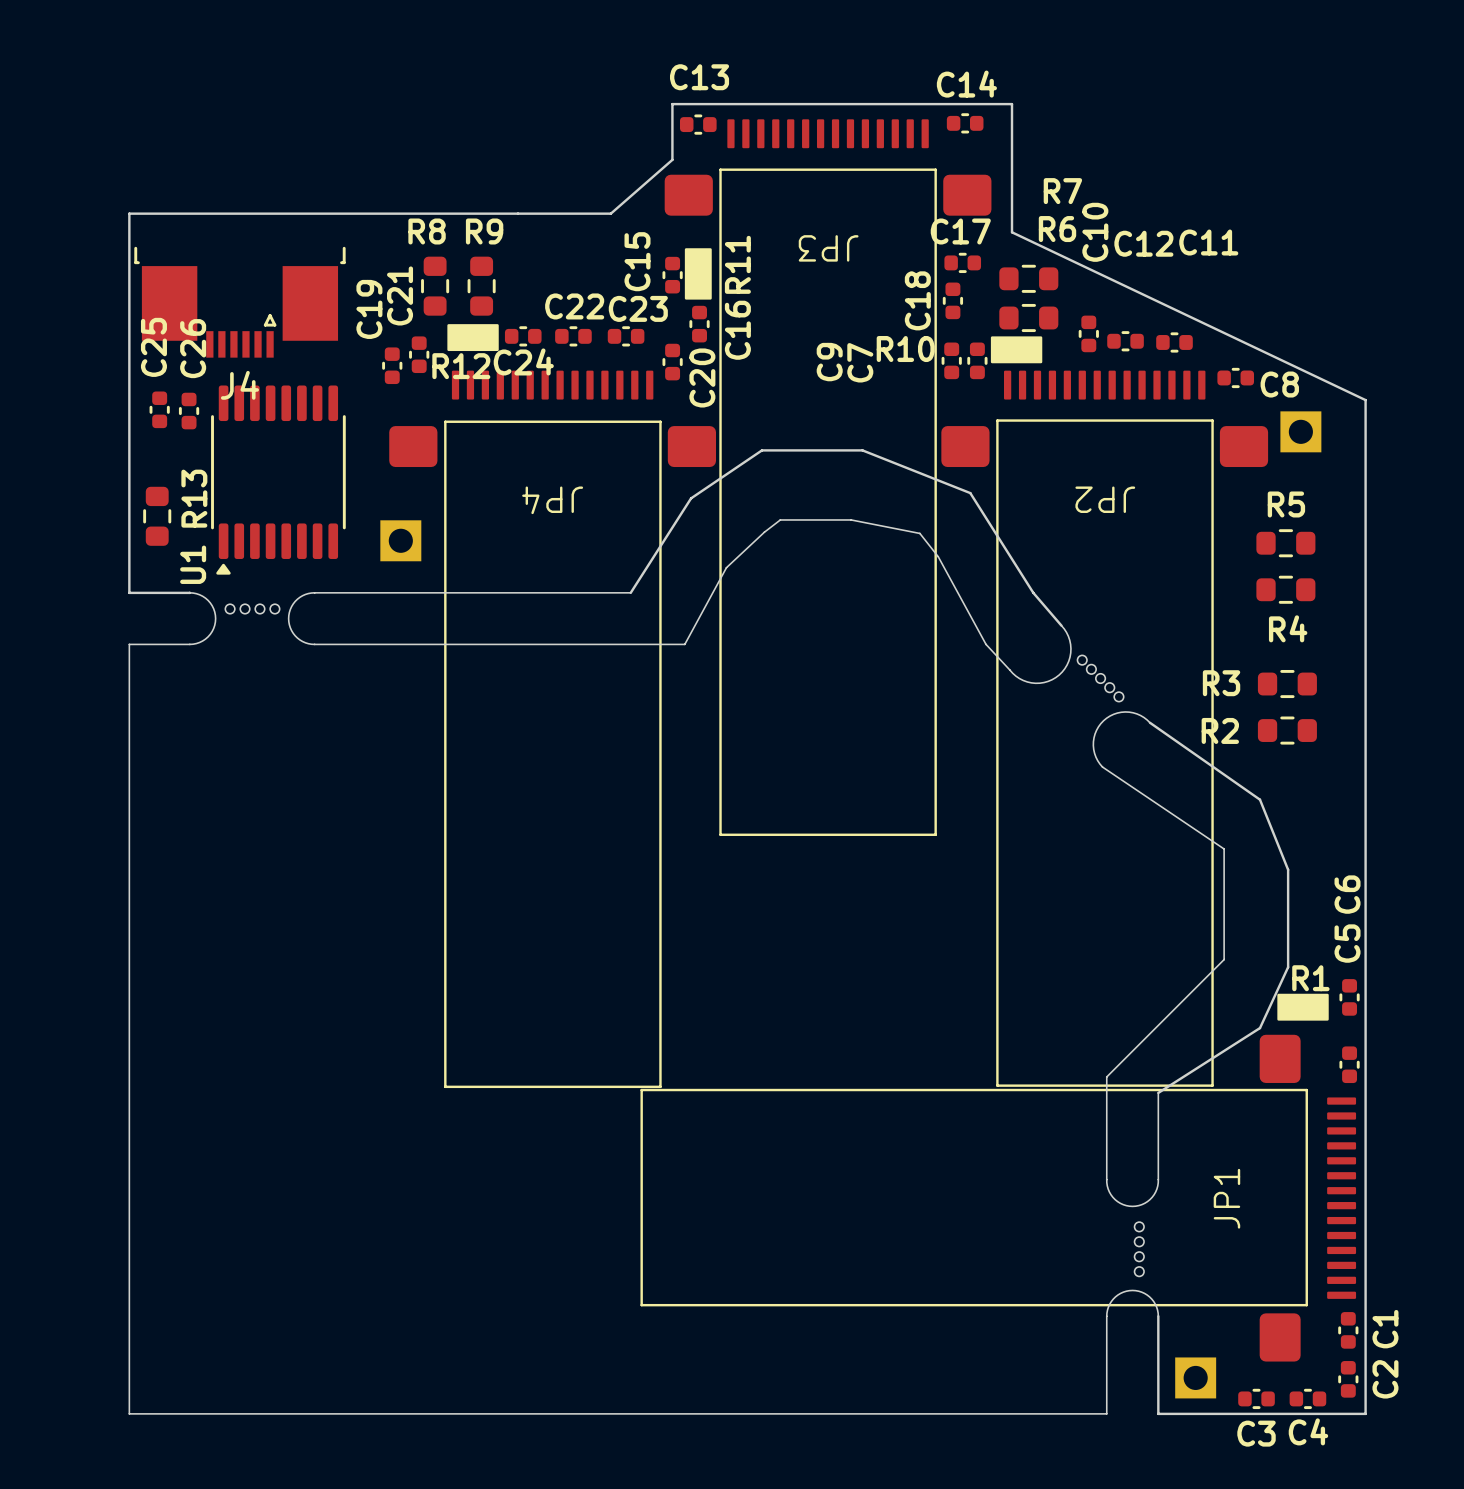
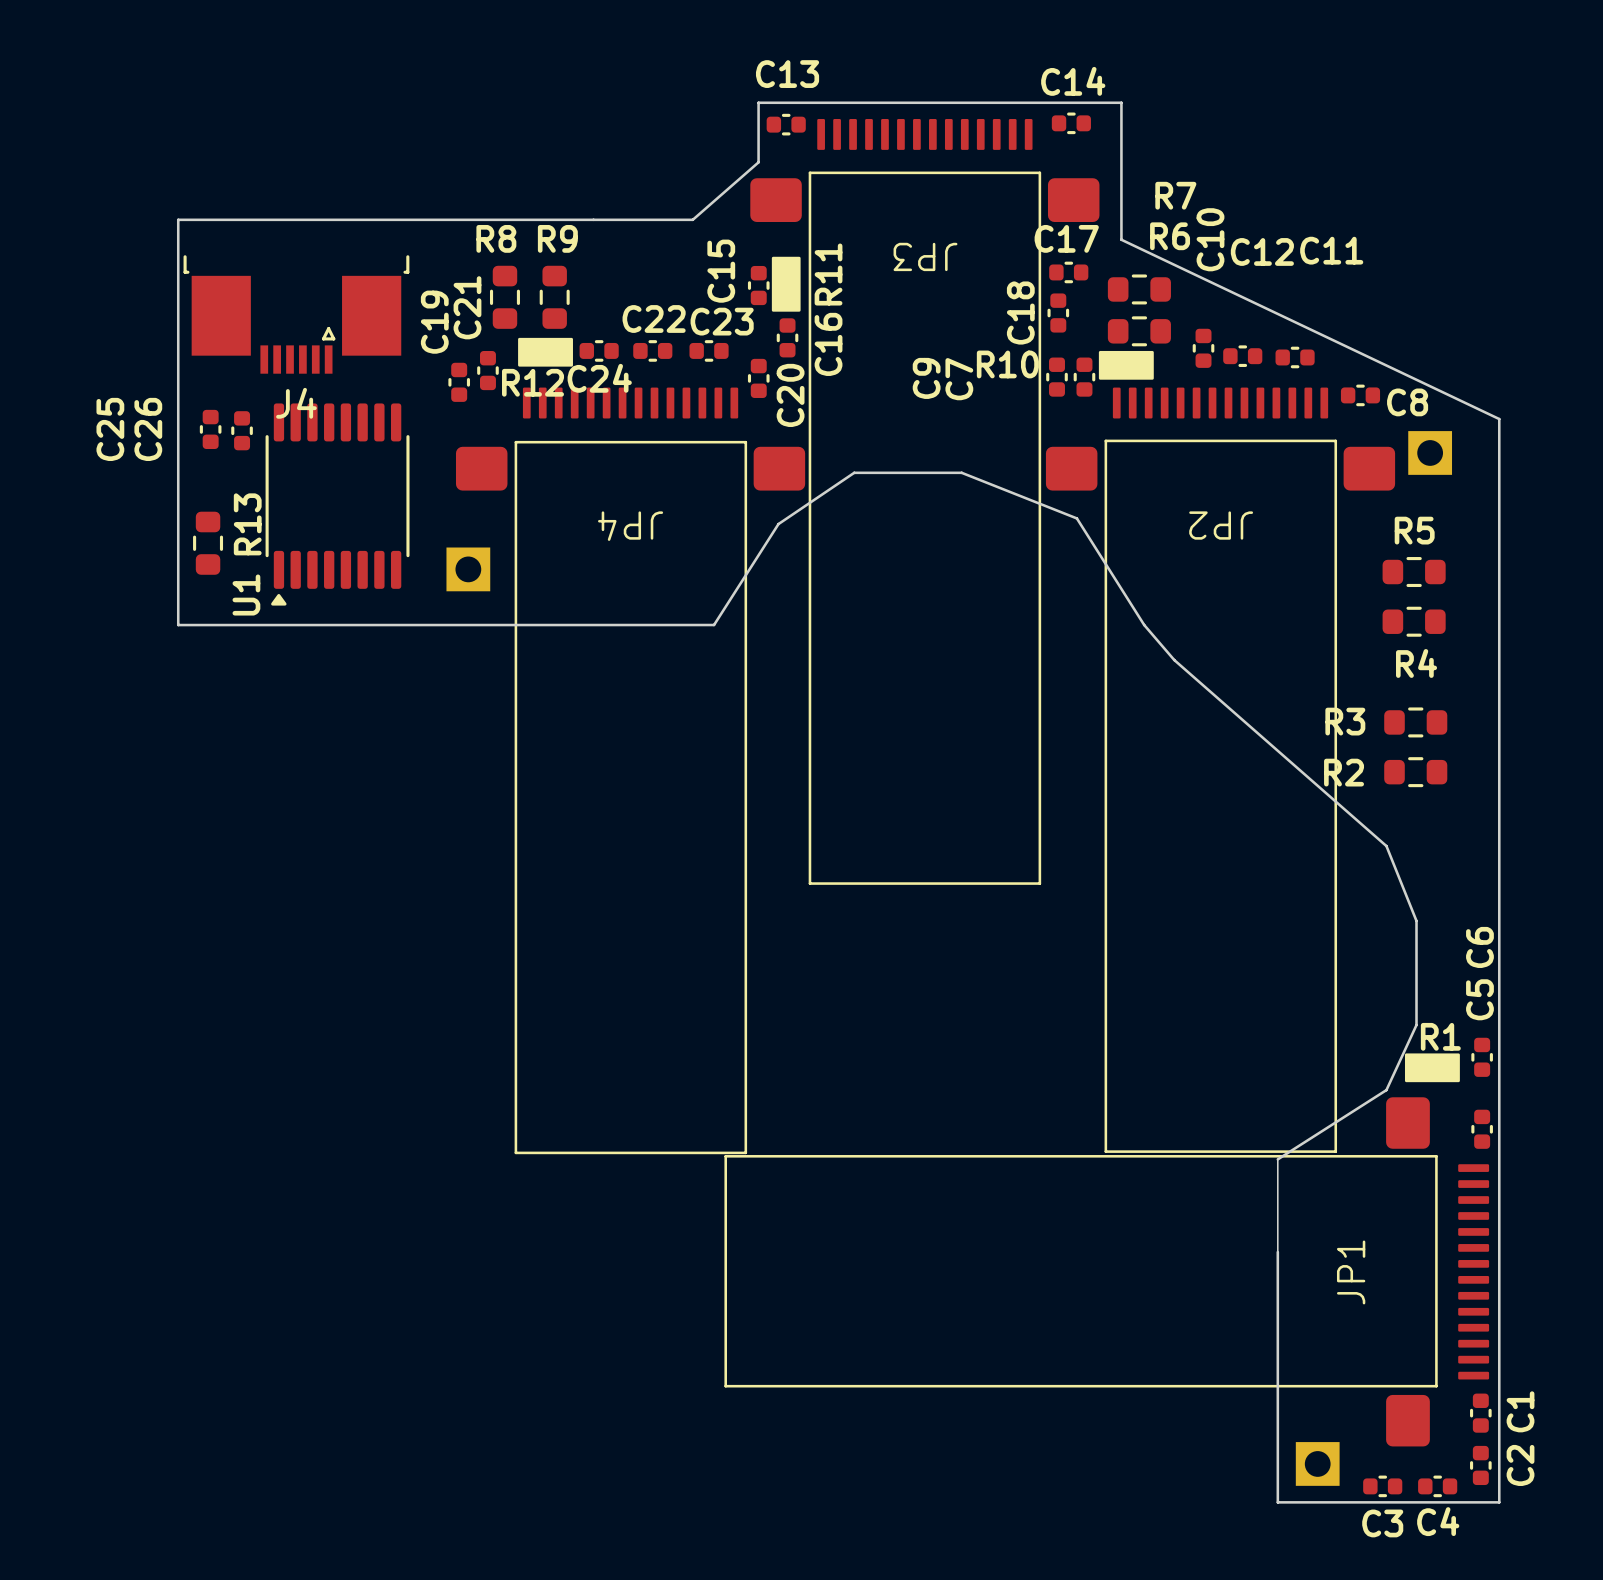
C25 name position: C25 (153, 347) -> C25 (110, 429)
C26 name position: C26 (193, 348) -> C26 (148, 429)
board edge: (129, 592) (196, 593) (210, 602) (215, 618) (210, 634) (196, 643) (129, 644) (129, 1413) (1106, 1413) (1107, 1310) (1111, 1301) (1117, 1295) (1132, 1290) (1147, 1295) (1153, 1301) (1157, 1310) (1158, 1413) -> (1277, 1252) (1277, 1502)
board edge: (630, 592) (311, 593) (299, 597) (293, 603) (289, 612) (288, 621) (295, 635) (302, 641) (311, 644) (684, 644) (726, 567) (780, 519) (851, 519) (919, 533) (938, 556) (986, 644) (1012, 673) (1023, 680) (1035, 683) (1048, 681) (1055, 677) (1064, 668) (1070, 657) (1070, 644) (1068, 636) (1061, 625) -> (714, 625) (178, 625)
round board edge: [224, 603, 236, 615] -> none
round board edge: [239, 603, 251, 615] -> none
round board edge: [254, 603, 266, 615] -> none
round board edge: [269, 603, 281, 615] -> none
round board edge: [1076, 654, 1088, 666] -> none
round board edge: [1086, 663, 1097, 675] -> none
round board edge: [1095, 673, 1106, 684] -> none
round board edge: [1104, 682, 1116, 694] -> none
round board edge: [1113, 691, 1125, 703] -> none
board edge: (1259, 799) (1136, 713) (1125, 711) (1113, 714) (1103, 720) (1096, 730) (1093, 749) (1102, 767) (1224, 849) (1224, 959) (1106, 1076) (1106, 1179) (1109, 1191) (1115, 1199) (1123, 1204) (1138, 1205) (1147, 1201) (1154, 1194) (1158, 1179) -> (1386, 846) (1174, 660)
round board edge: [1133, 1221, 1145, 1233] -> none
round board edge: [1133, 1236, 1145, 1248] -> none
round board edge: [1133, 1251, 1145, 1263] -> none
round board edge: [1133, 1266, 1145, 1278] -> none

